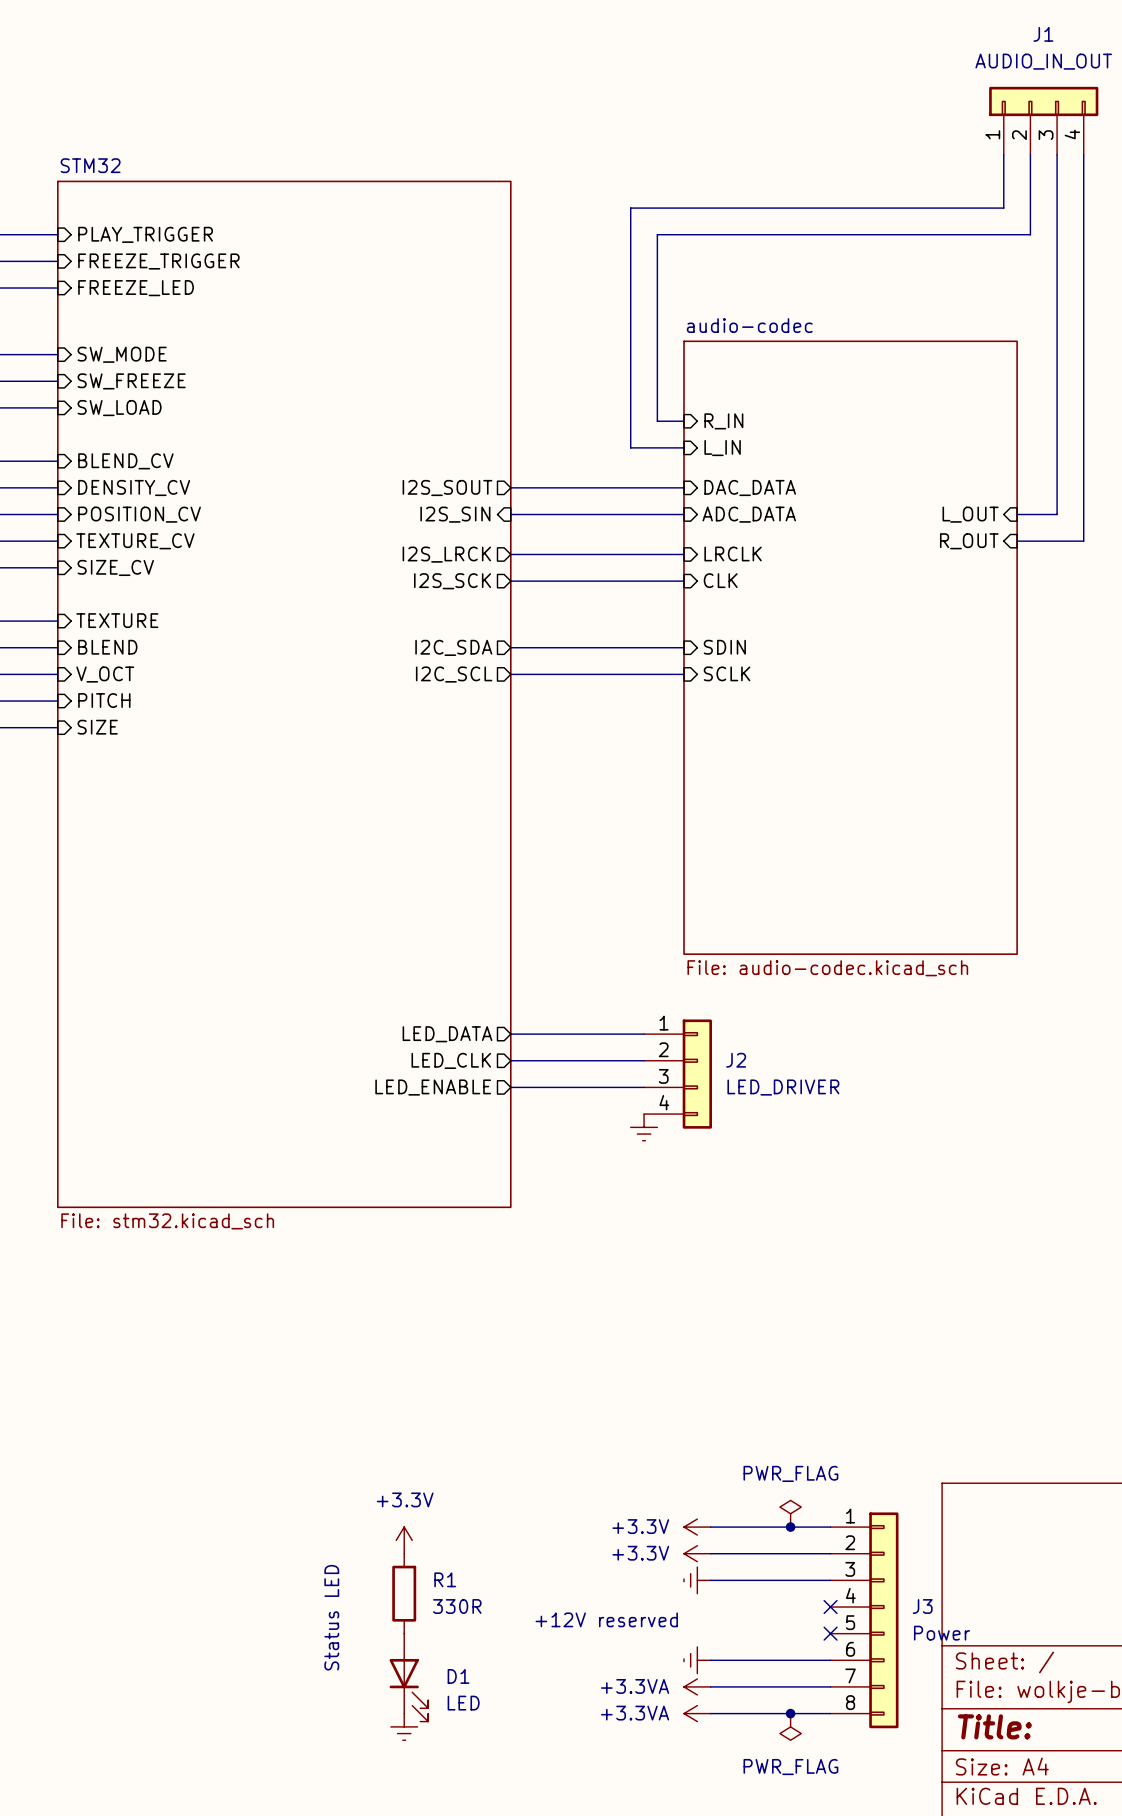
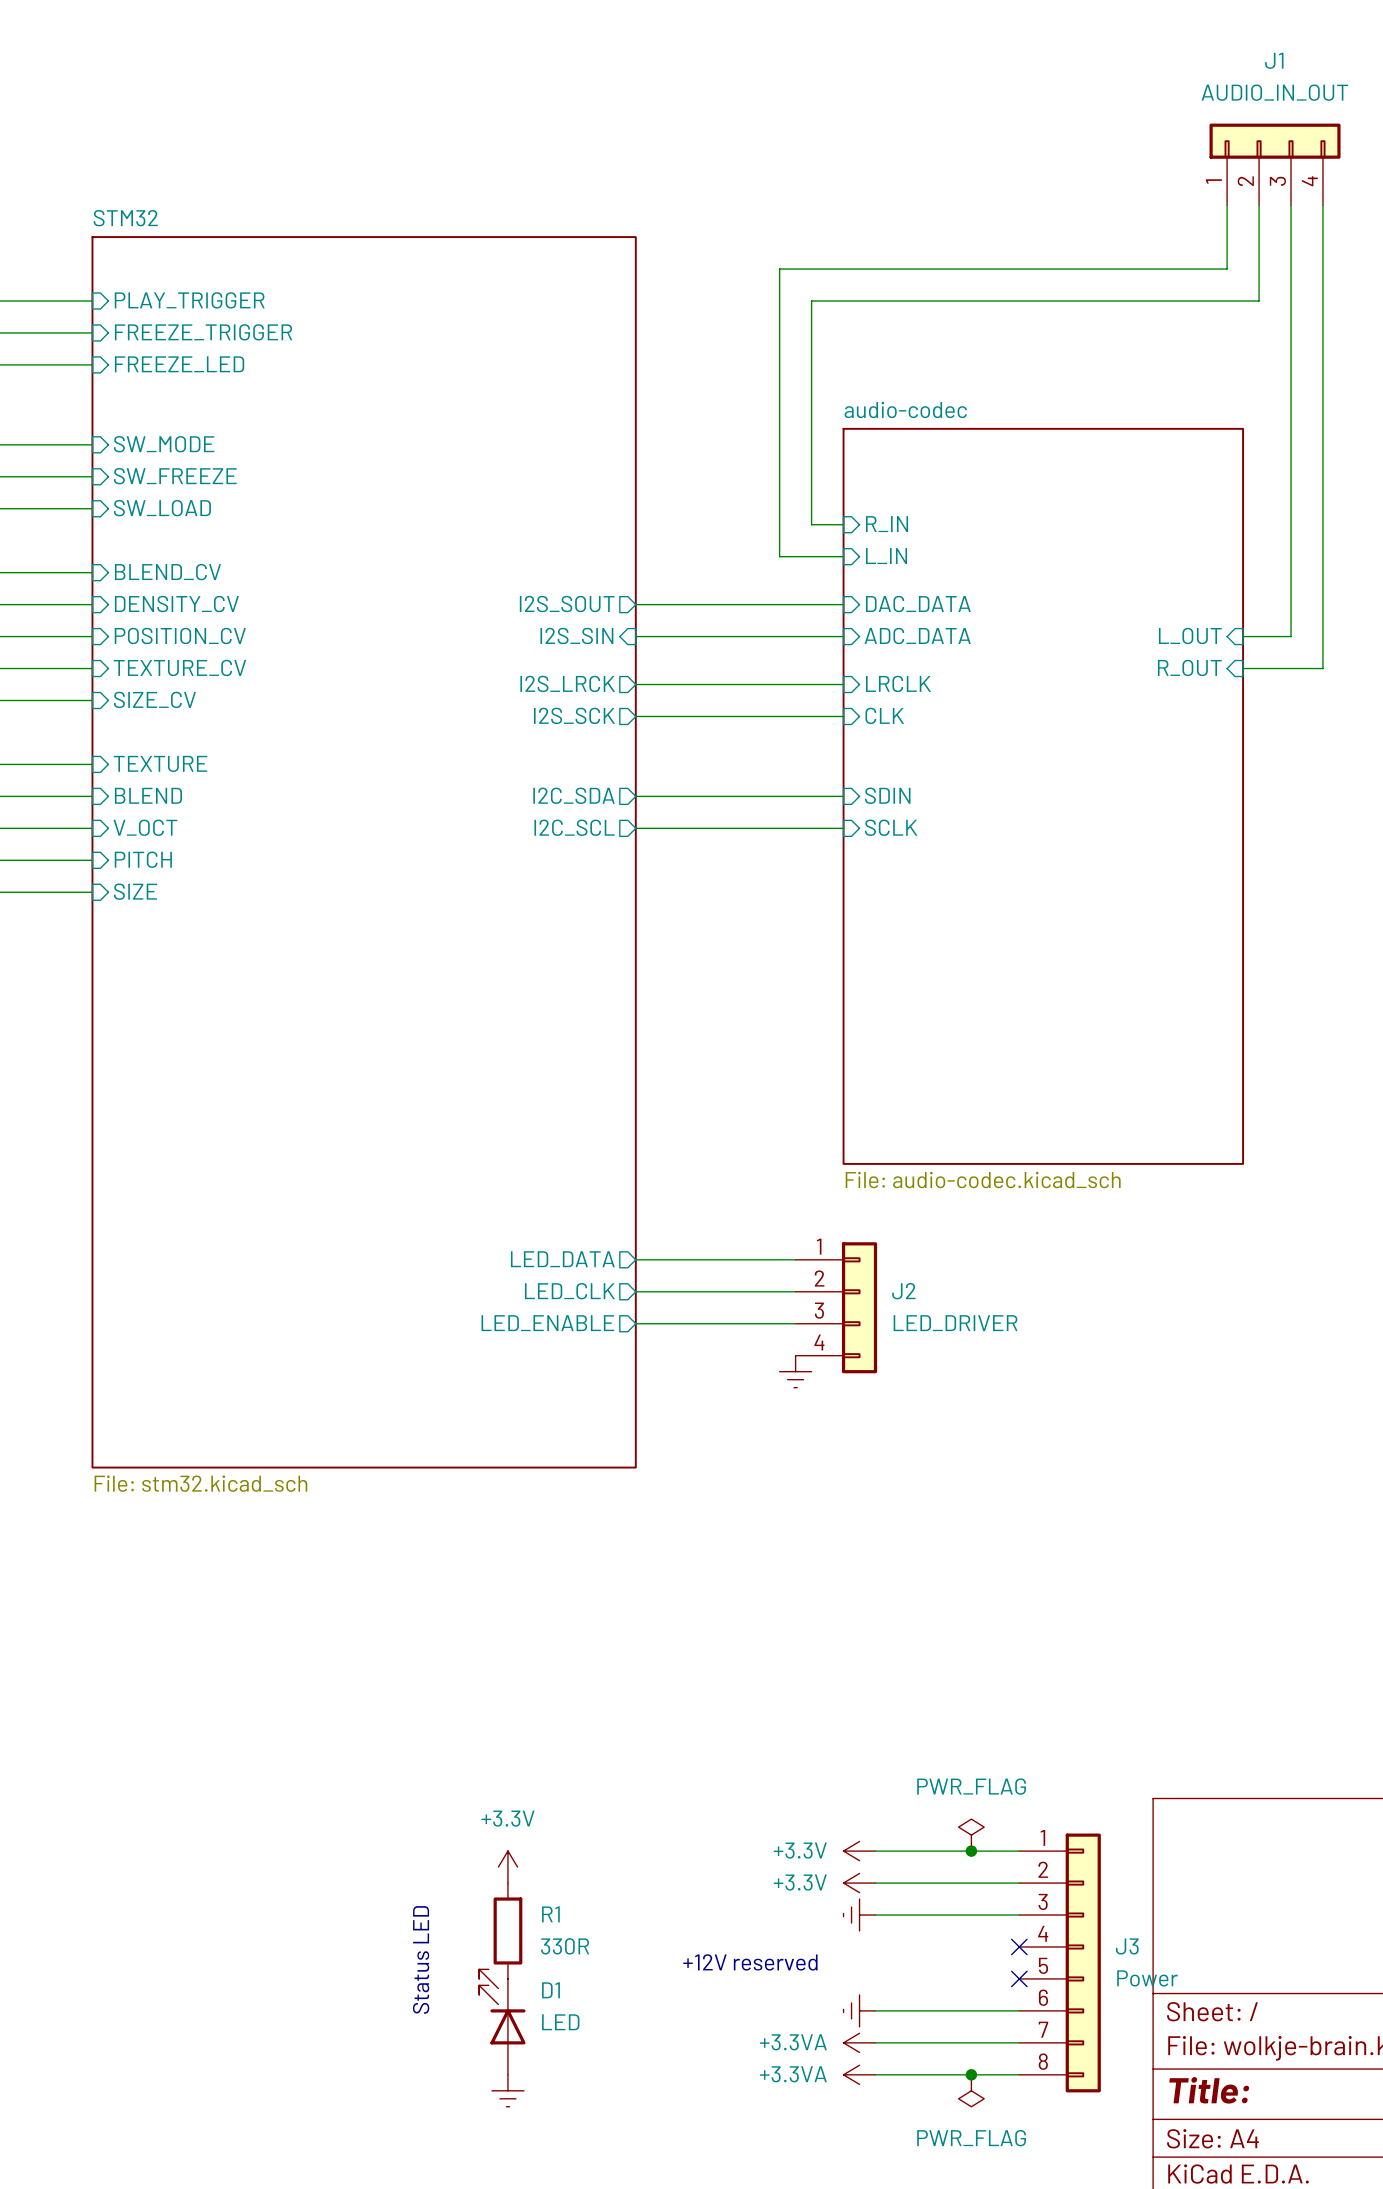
D1 name position: D1 (458, 1676) -> D1 (550, 1990)
D1 rotation: 0° (408, 1690) -> 180° (502, 2006)
D1 value position: LED (463, 1703) -> LED (560, 2022)

